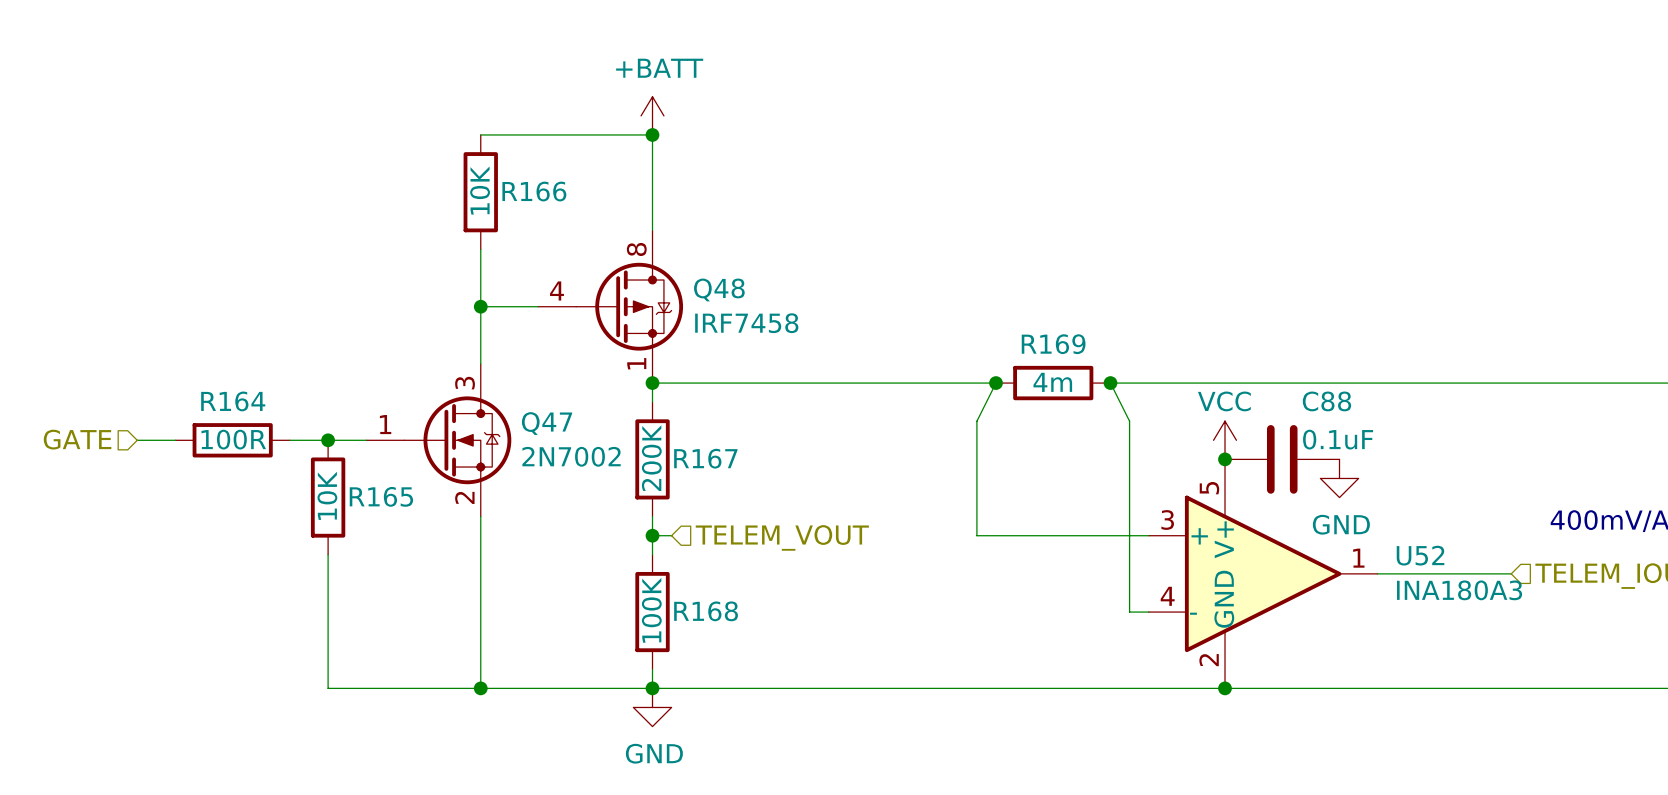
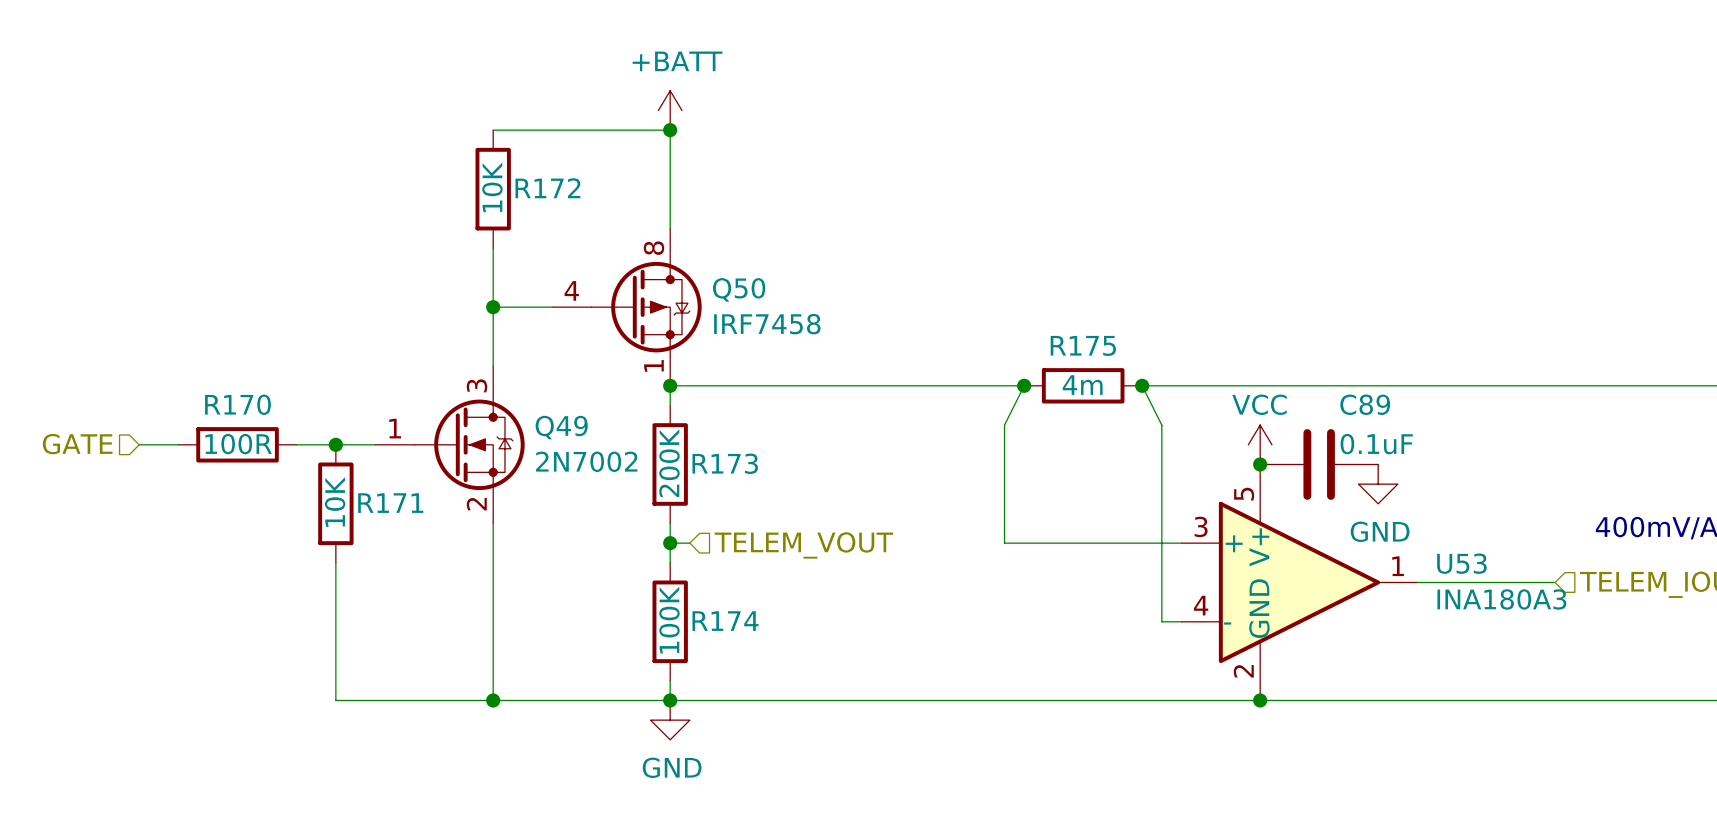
R166 name: R166 (534, 191) -> R172 (547, 188)
Q48 name: Q48 (719, 289) -> Q50 (739, 289)
R169 name: R169 (1053, 344) -> R175 (1083, 345)
R164 name: R164 (233, 401) -> R170 (237, 404)
C88 name: C88 (1326, 401) -> C89 (1365, 404)
Q47 name: Q47 (547, 423) -> Q49 (561, 427)
R167 name: R167 (705, 458) -> R173 (725, 463)
R165 name: R165 (381, 496) -> R171 (390, 503)
U52 name: U52 (1420, 555) -> U53 (1461, 563)
R168 name: R168 (706, 611) -> R174 (725, 621)

